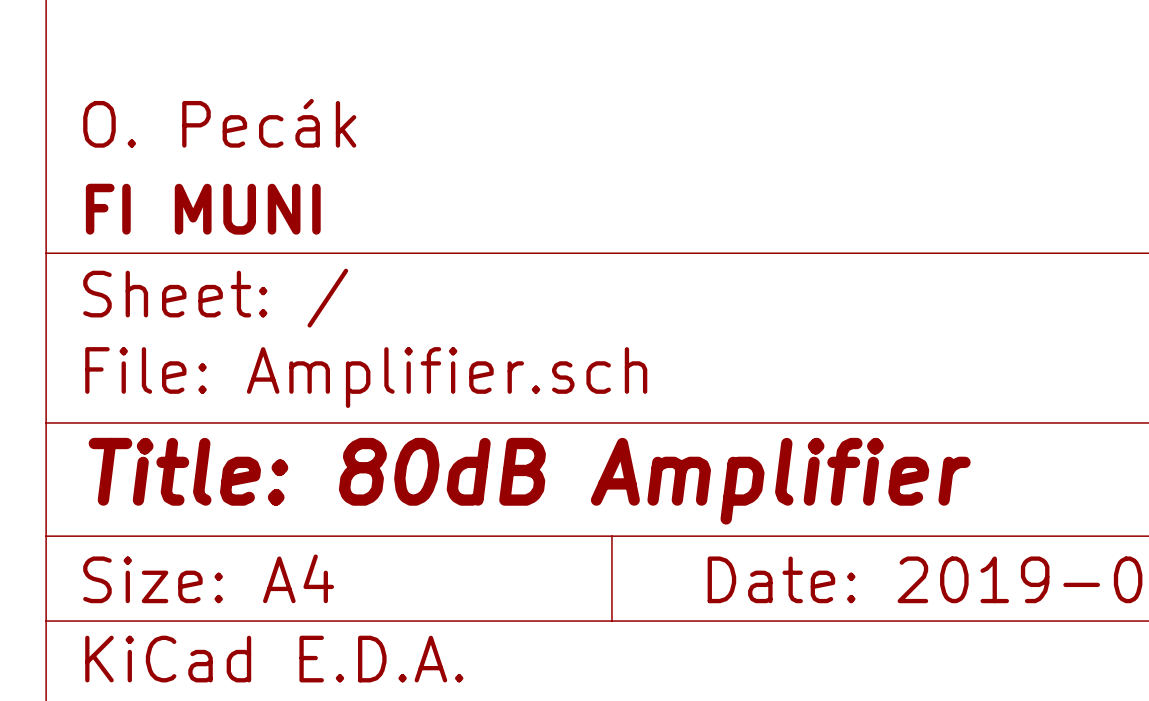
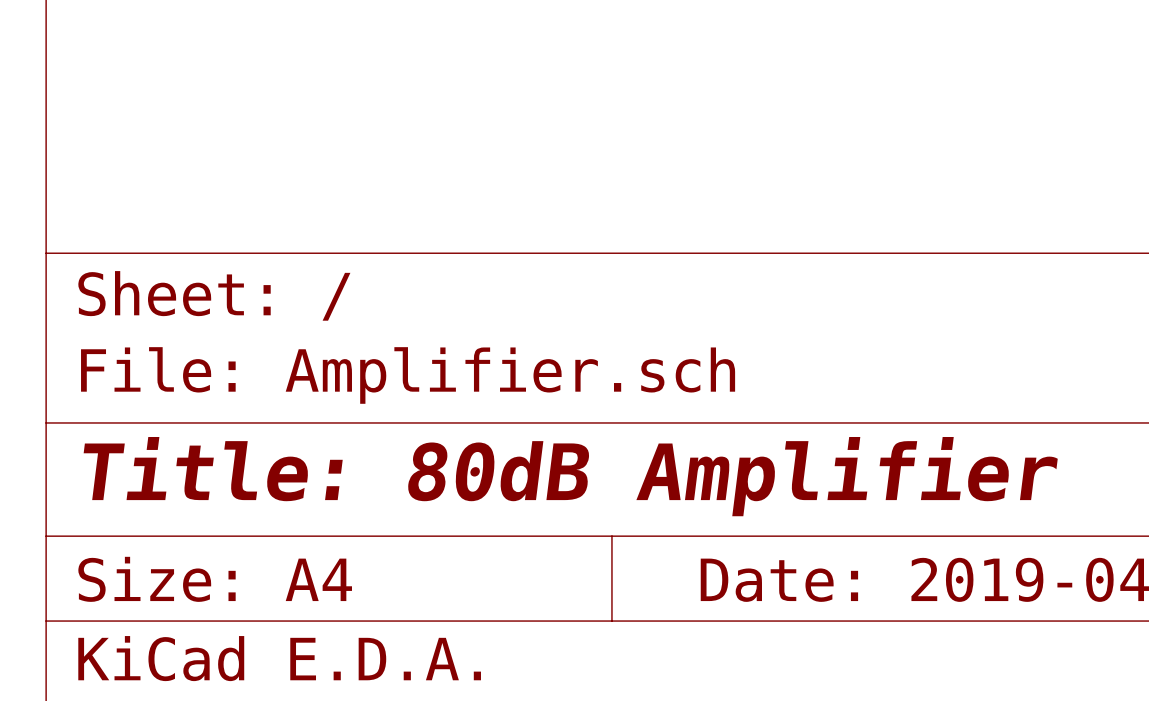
title block: O. Pecák (219, 123) -> none
title block: FI MUNI (203, 209) -> none

